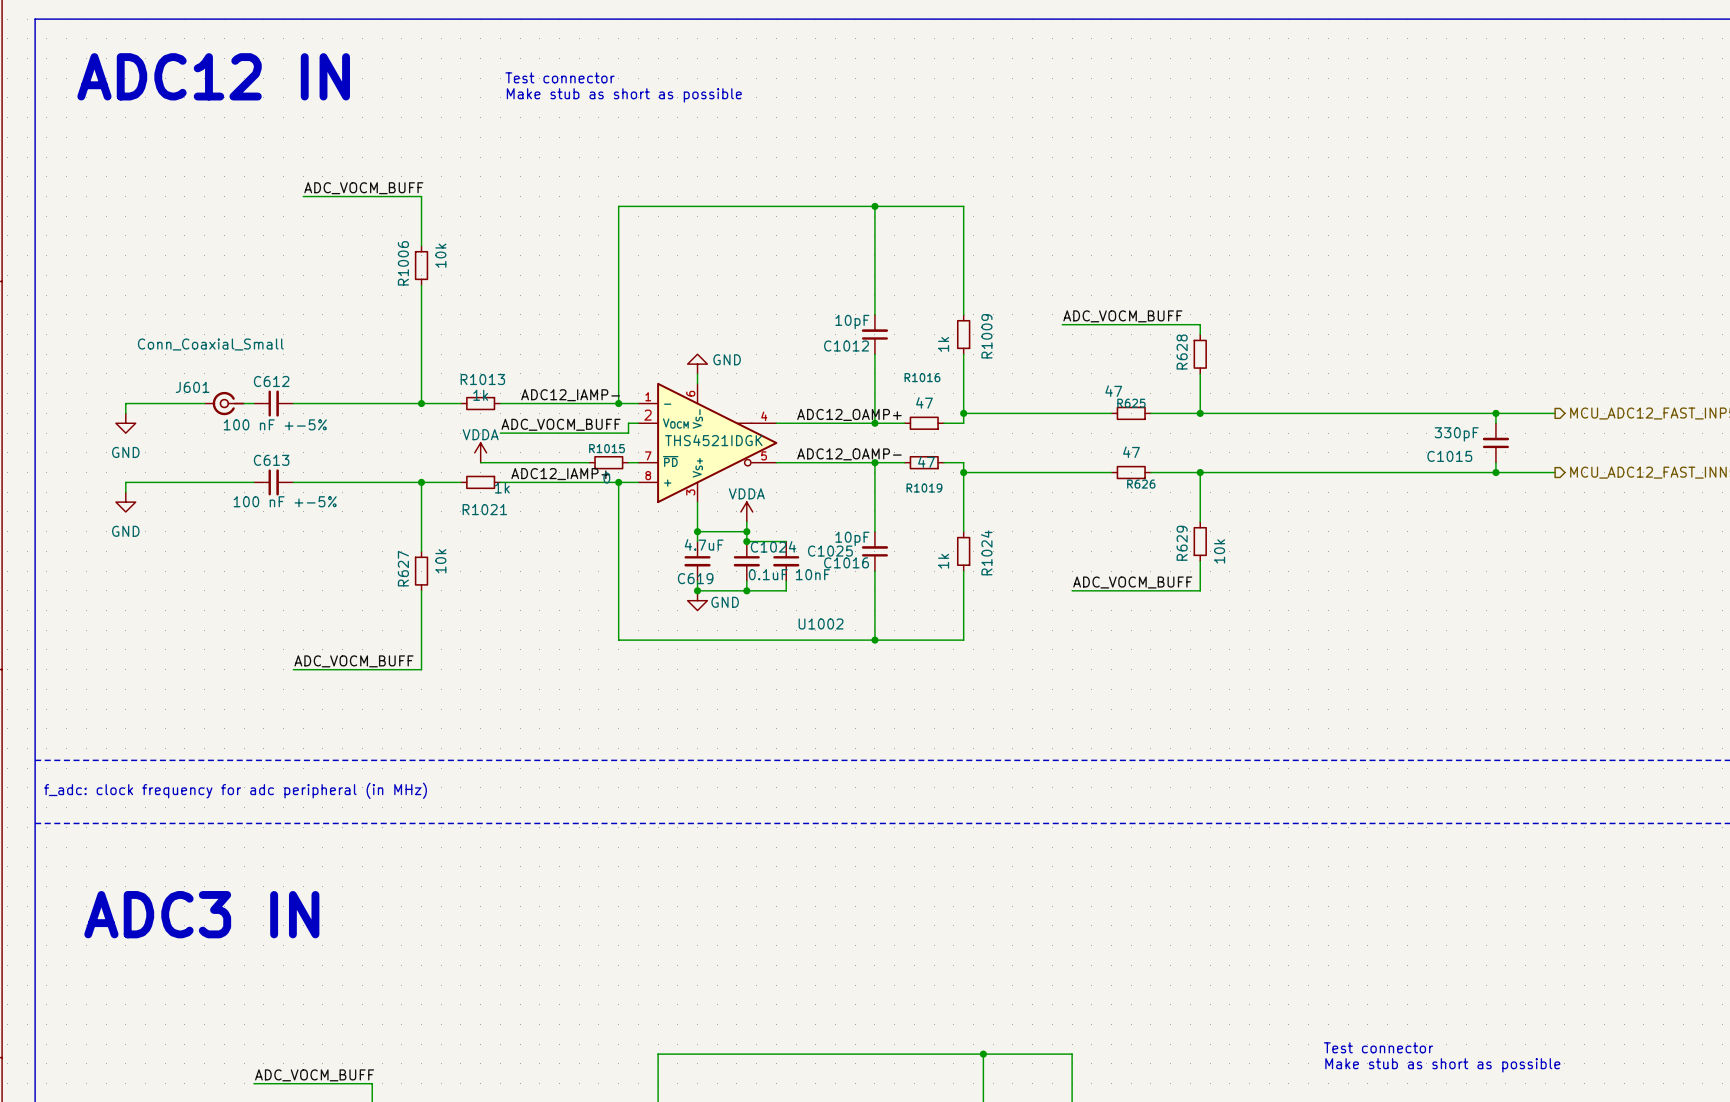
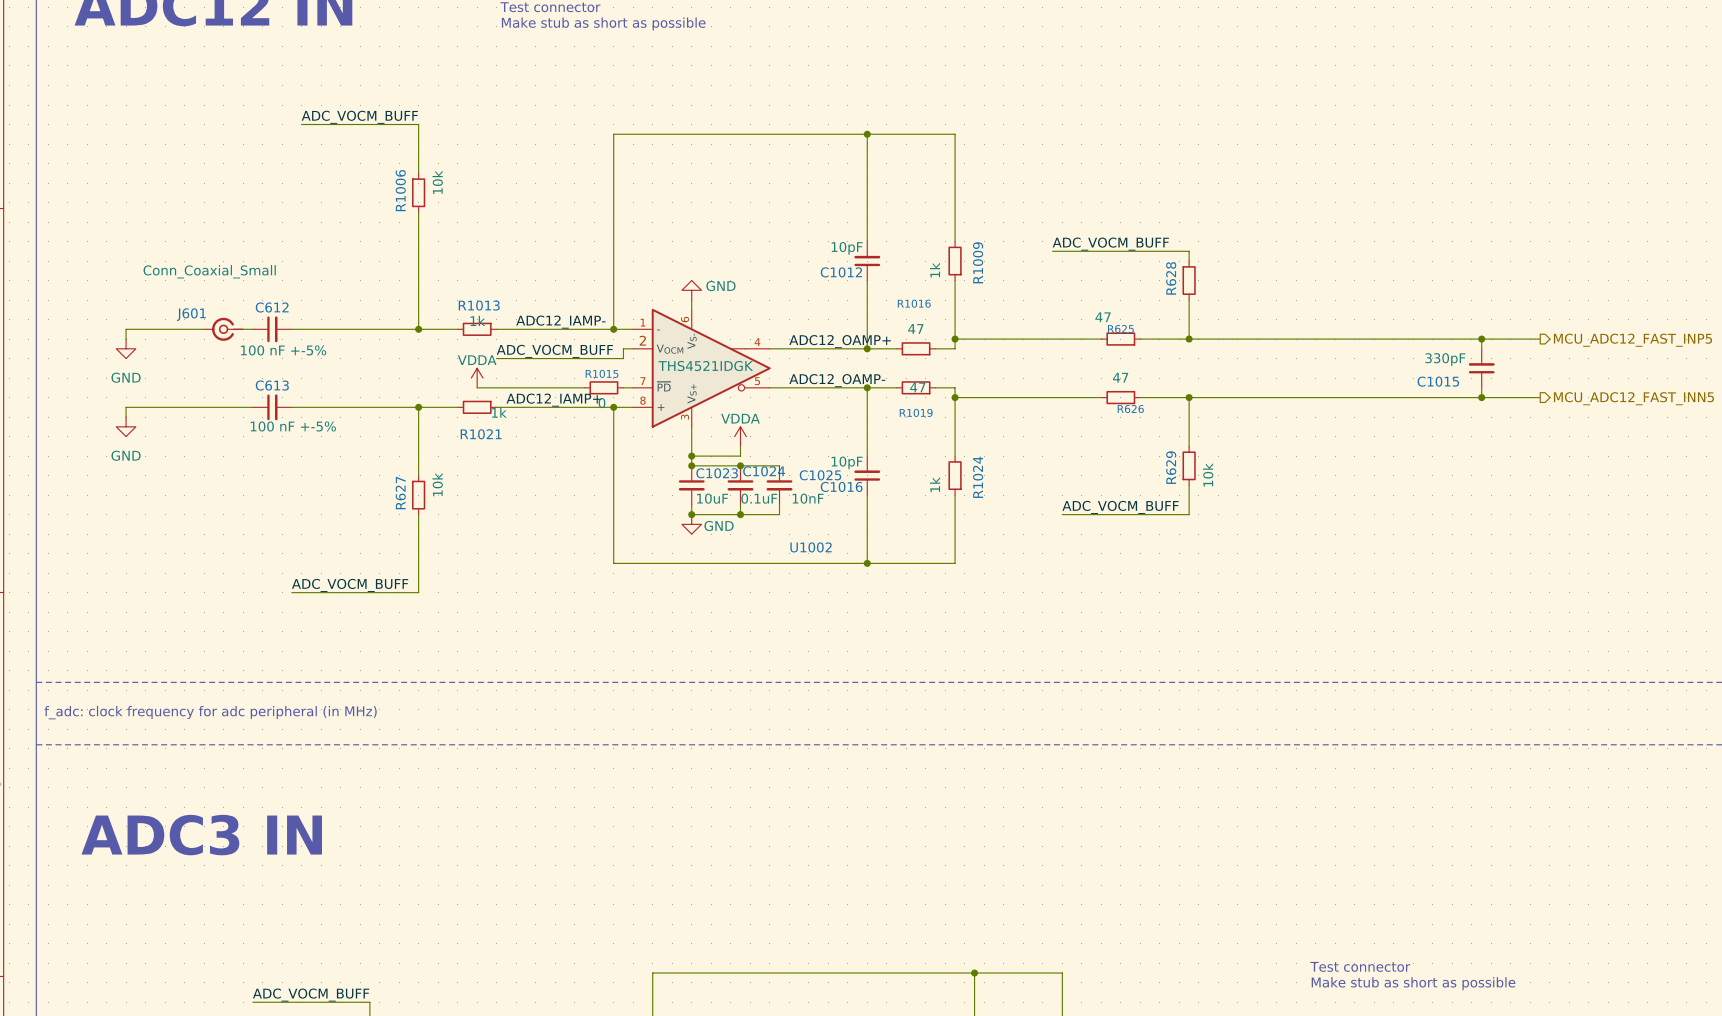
junction: (746, 531) -> none
junction: none -> (691, 465)
C619 value: 4.7uF (704, 544) -> 10uF (712, 498)
C619 name: C619 (695, 578) -> C1023 (717, 473)

